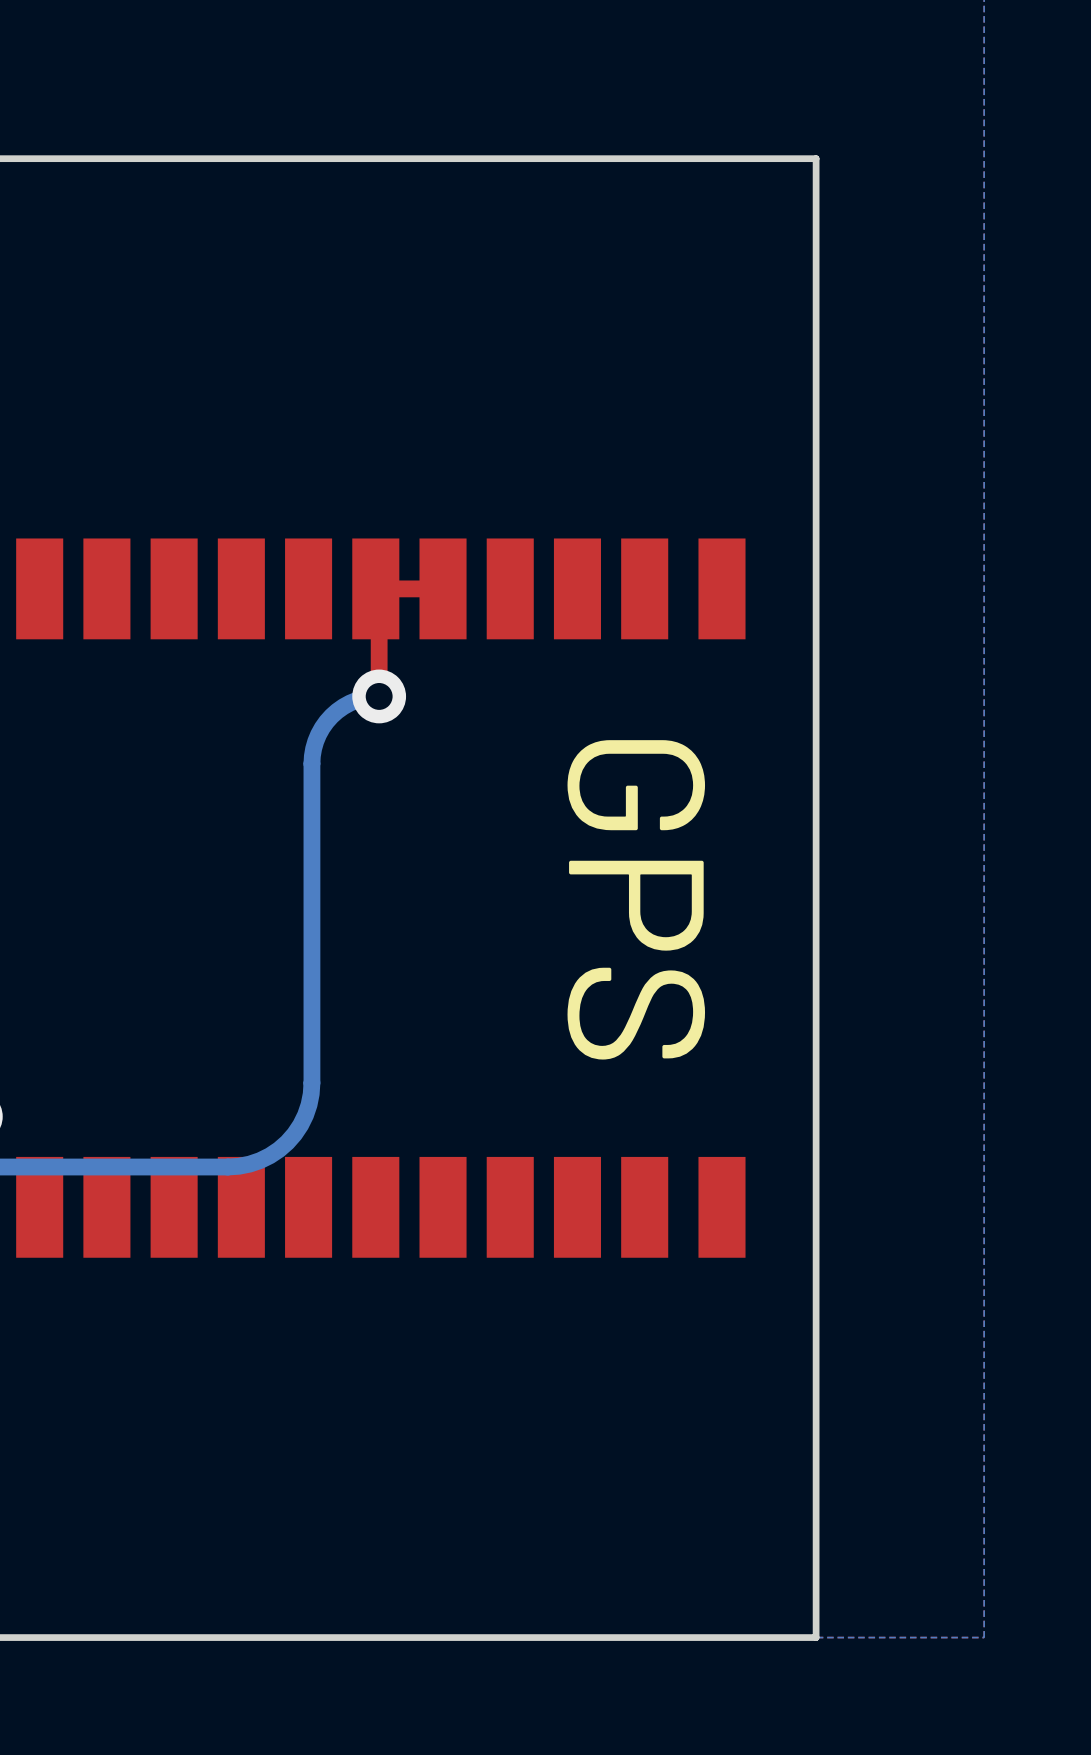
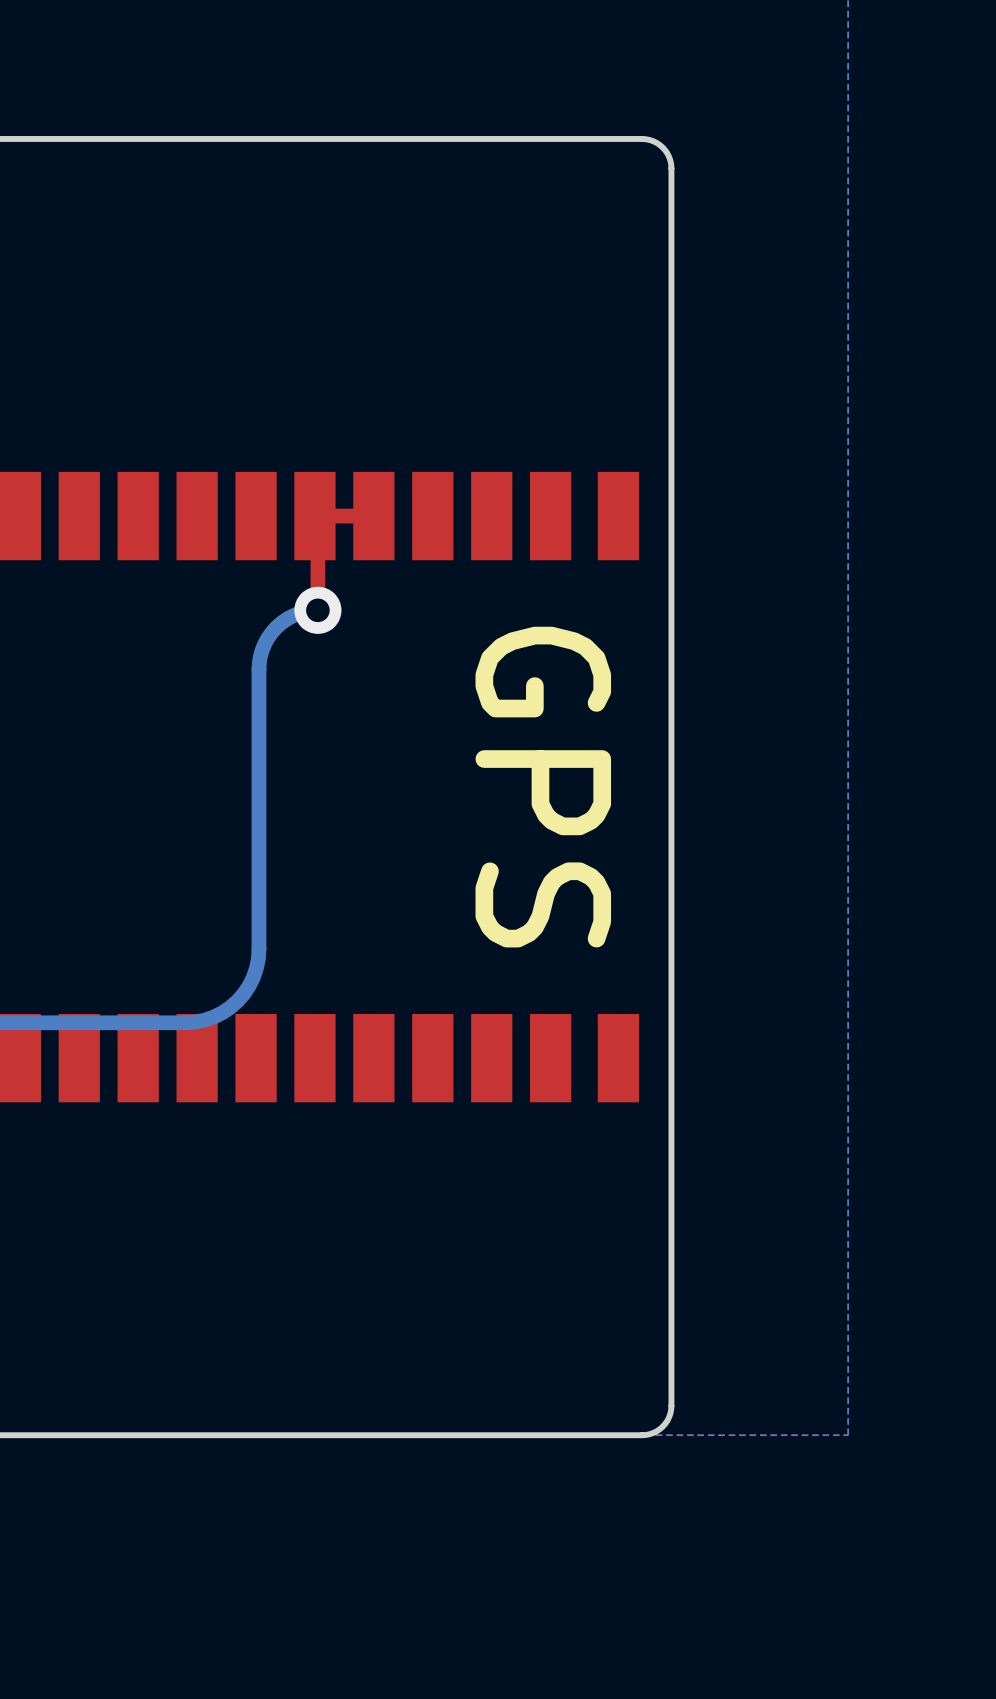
board edge: (748, 158) (816, 158) (816, 1637) (748, 1637) -> (641, 138) (653, 141) (662, 147) (669, 157) (671, 168) (671, 1405) (669, 1417) (662, 1426) (653, 1432) (641, 1435)

